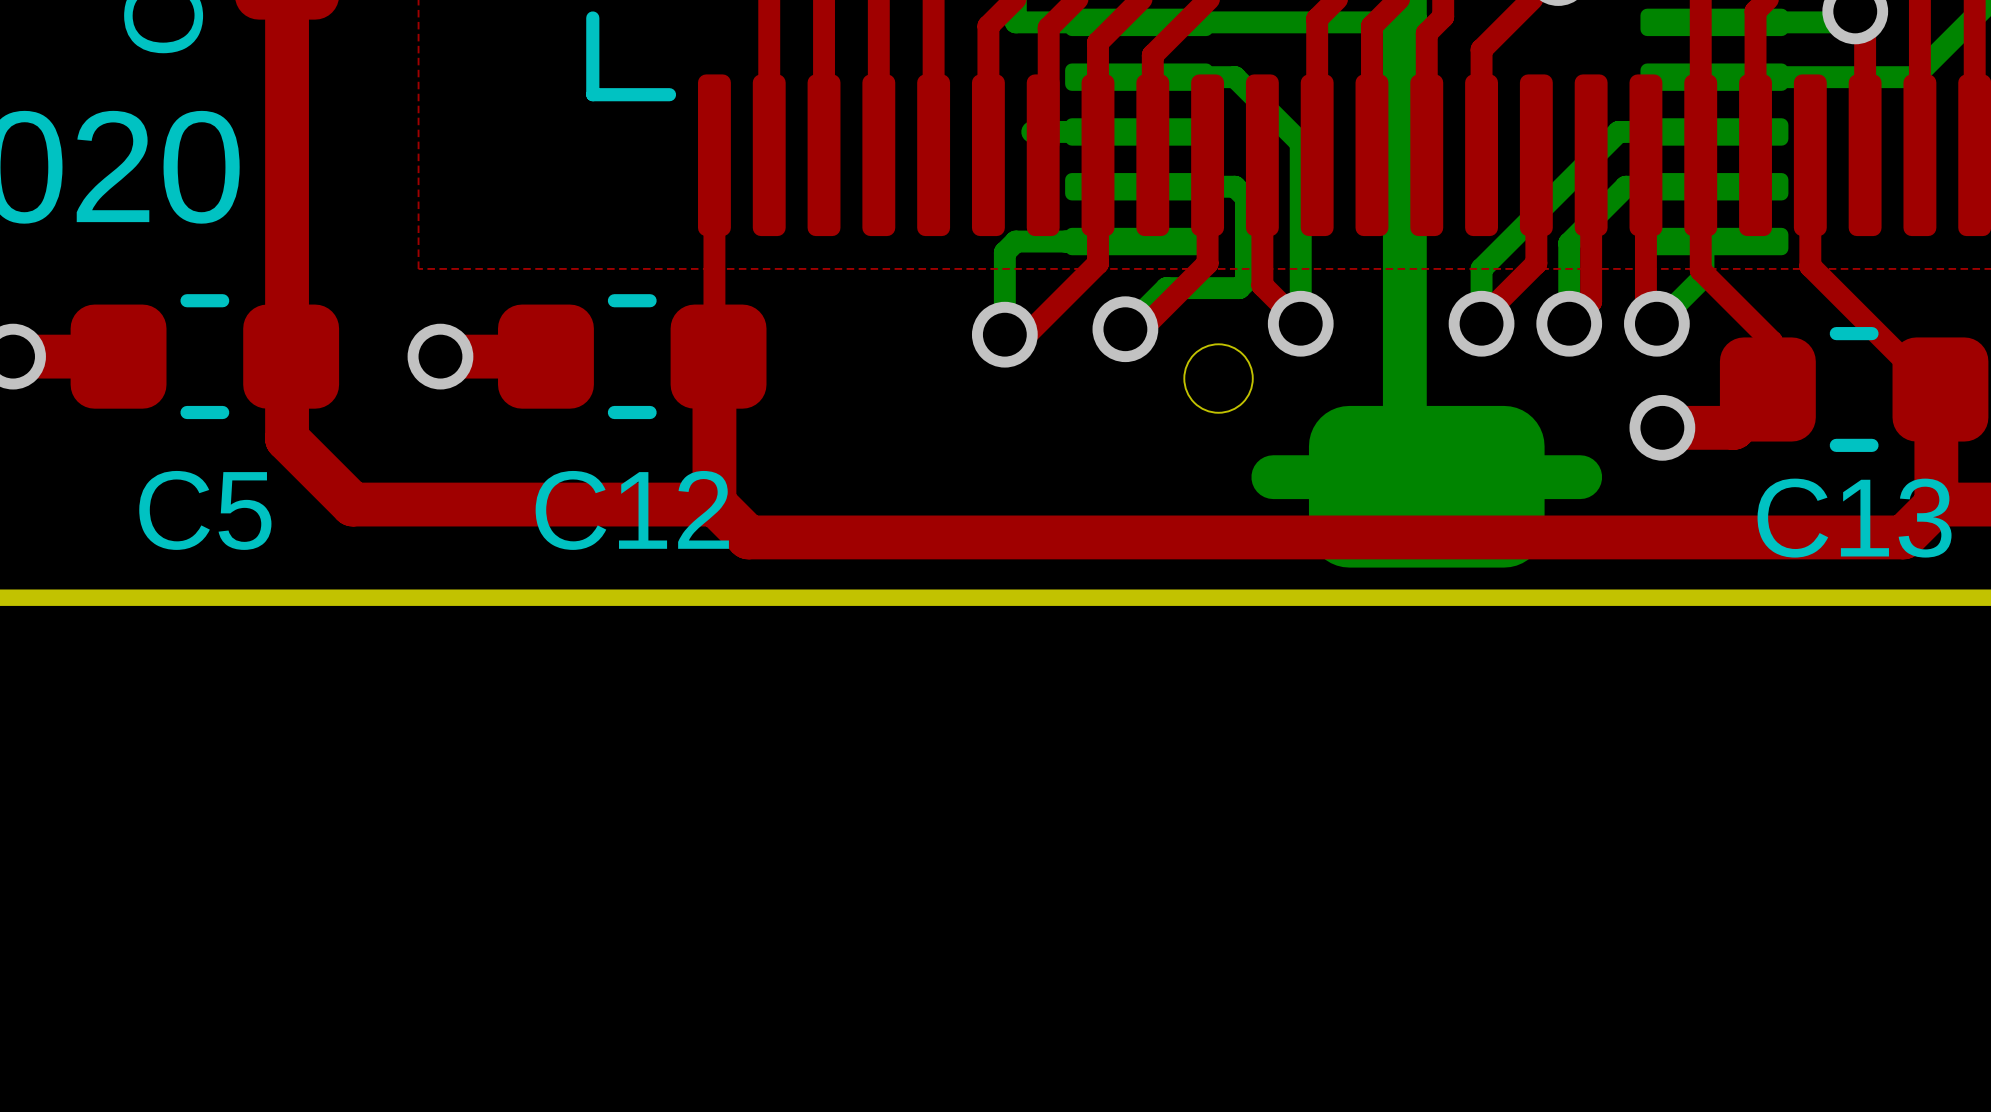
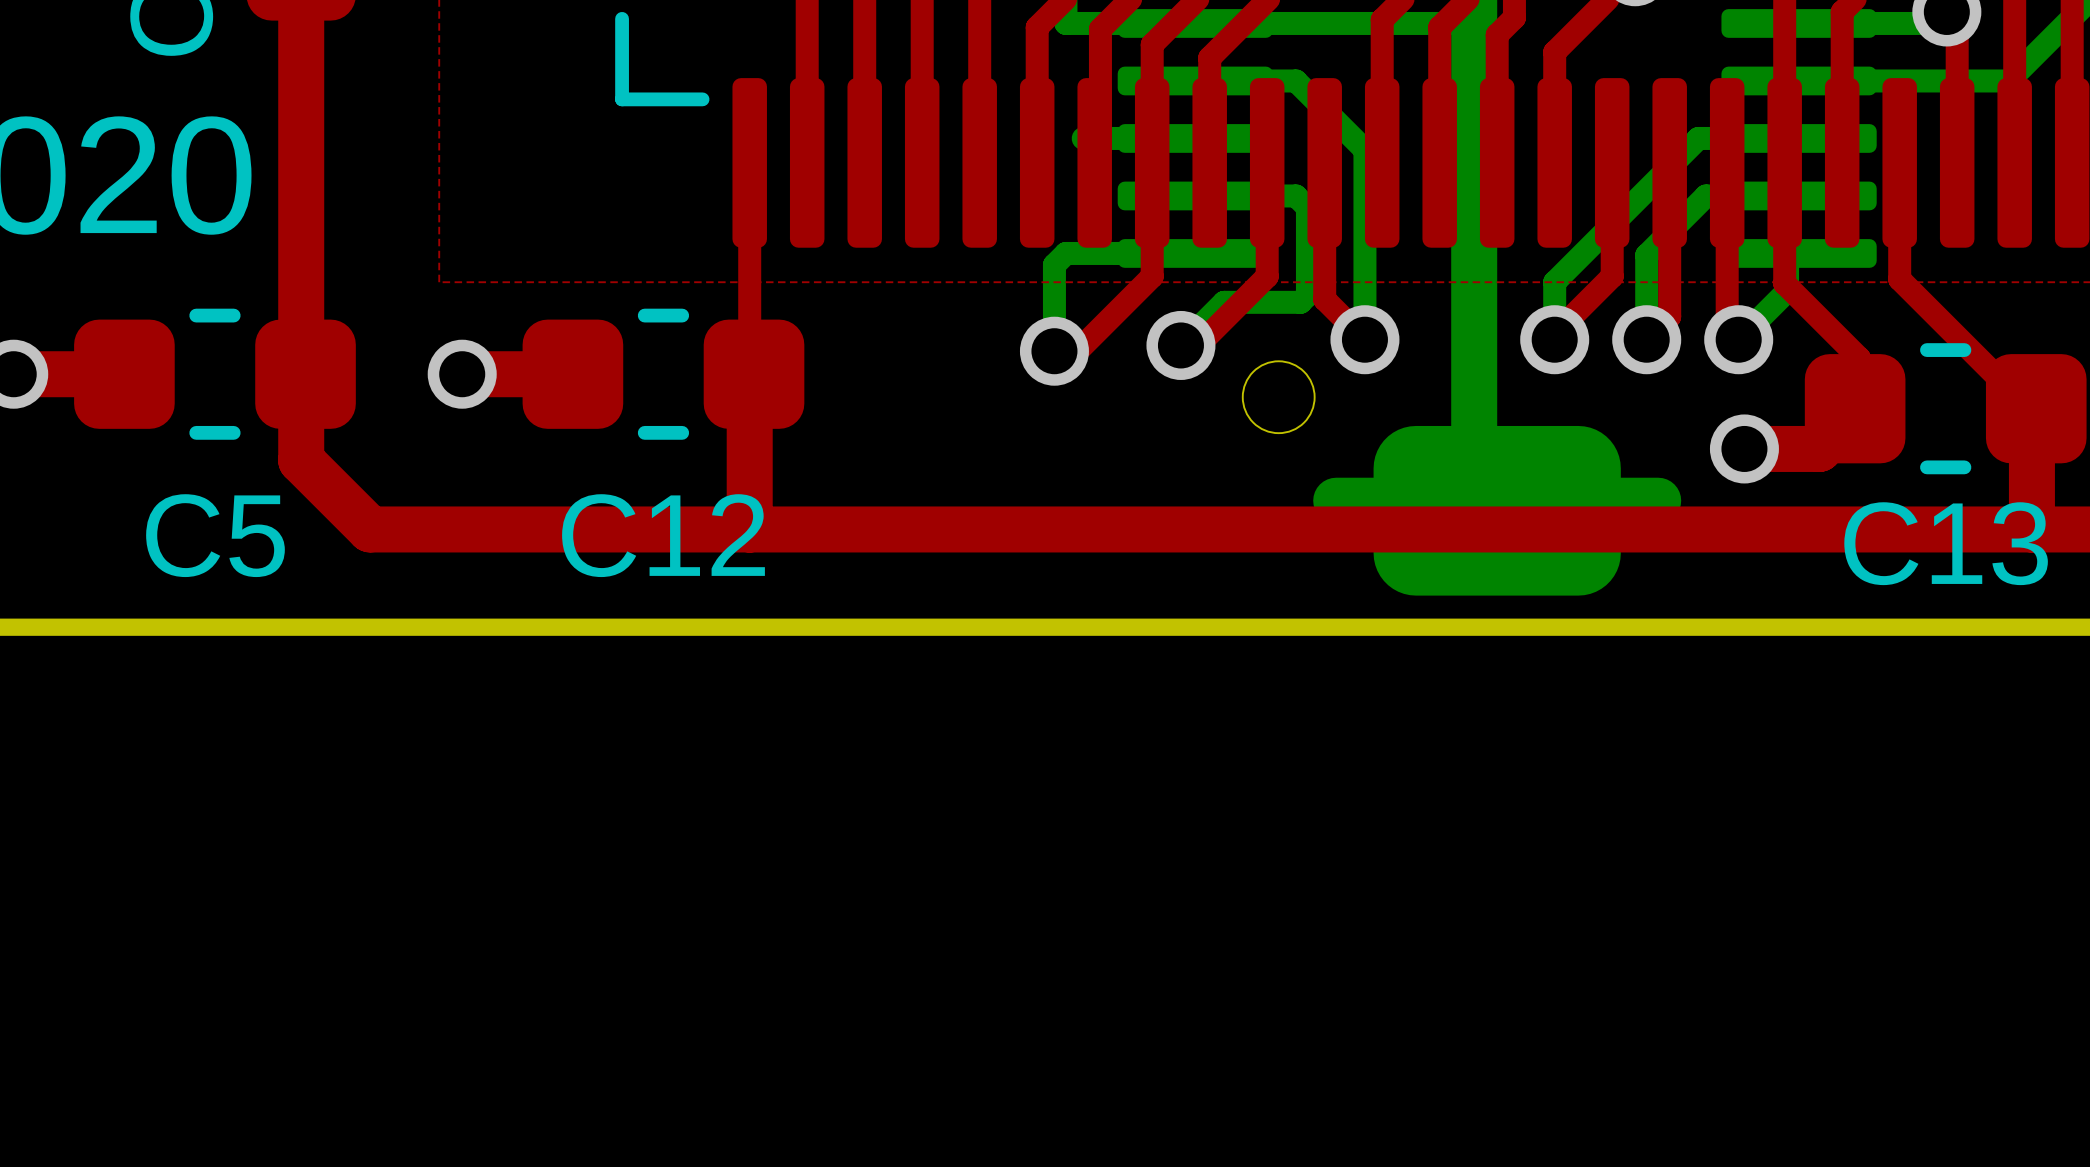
top track: (715, 504) (748, 537) (1903, 537) (1936, 504) -> (750, 529) (2031, 529)

